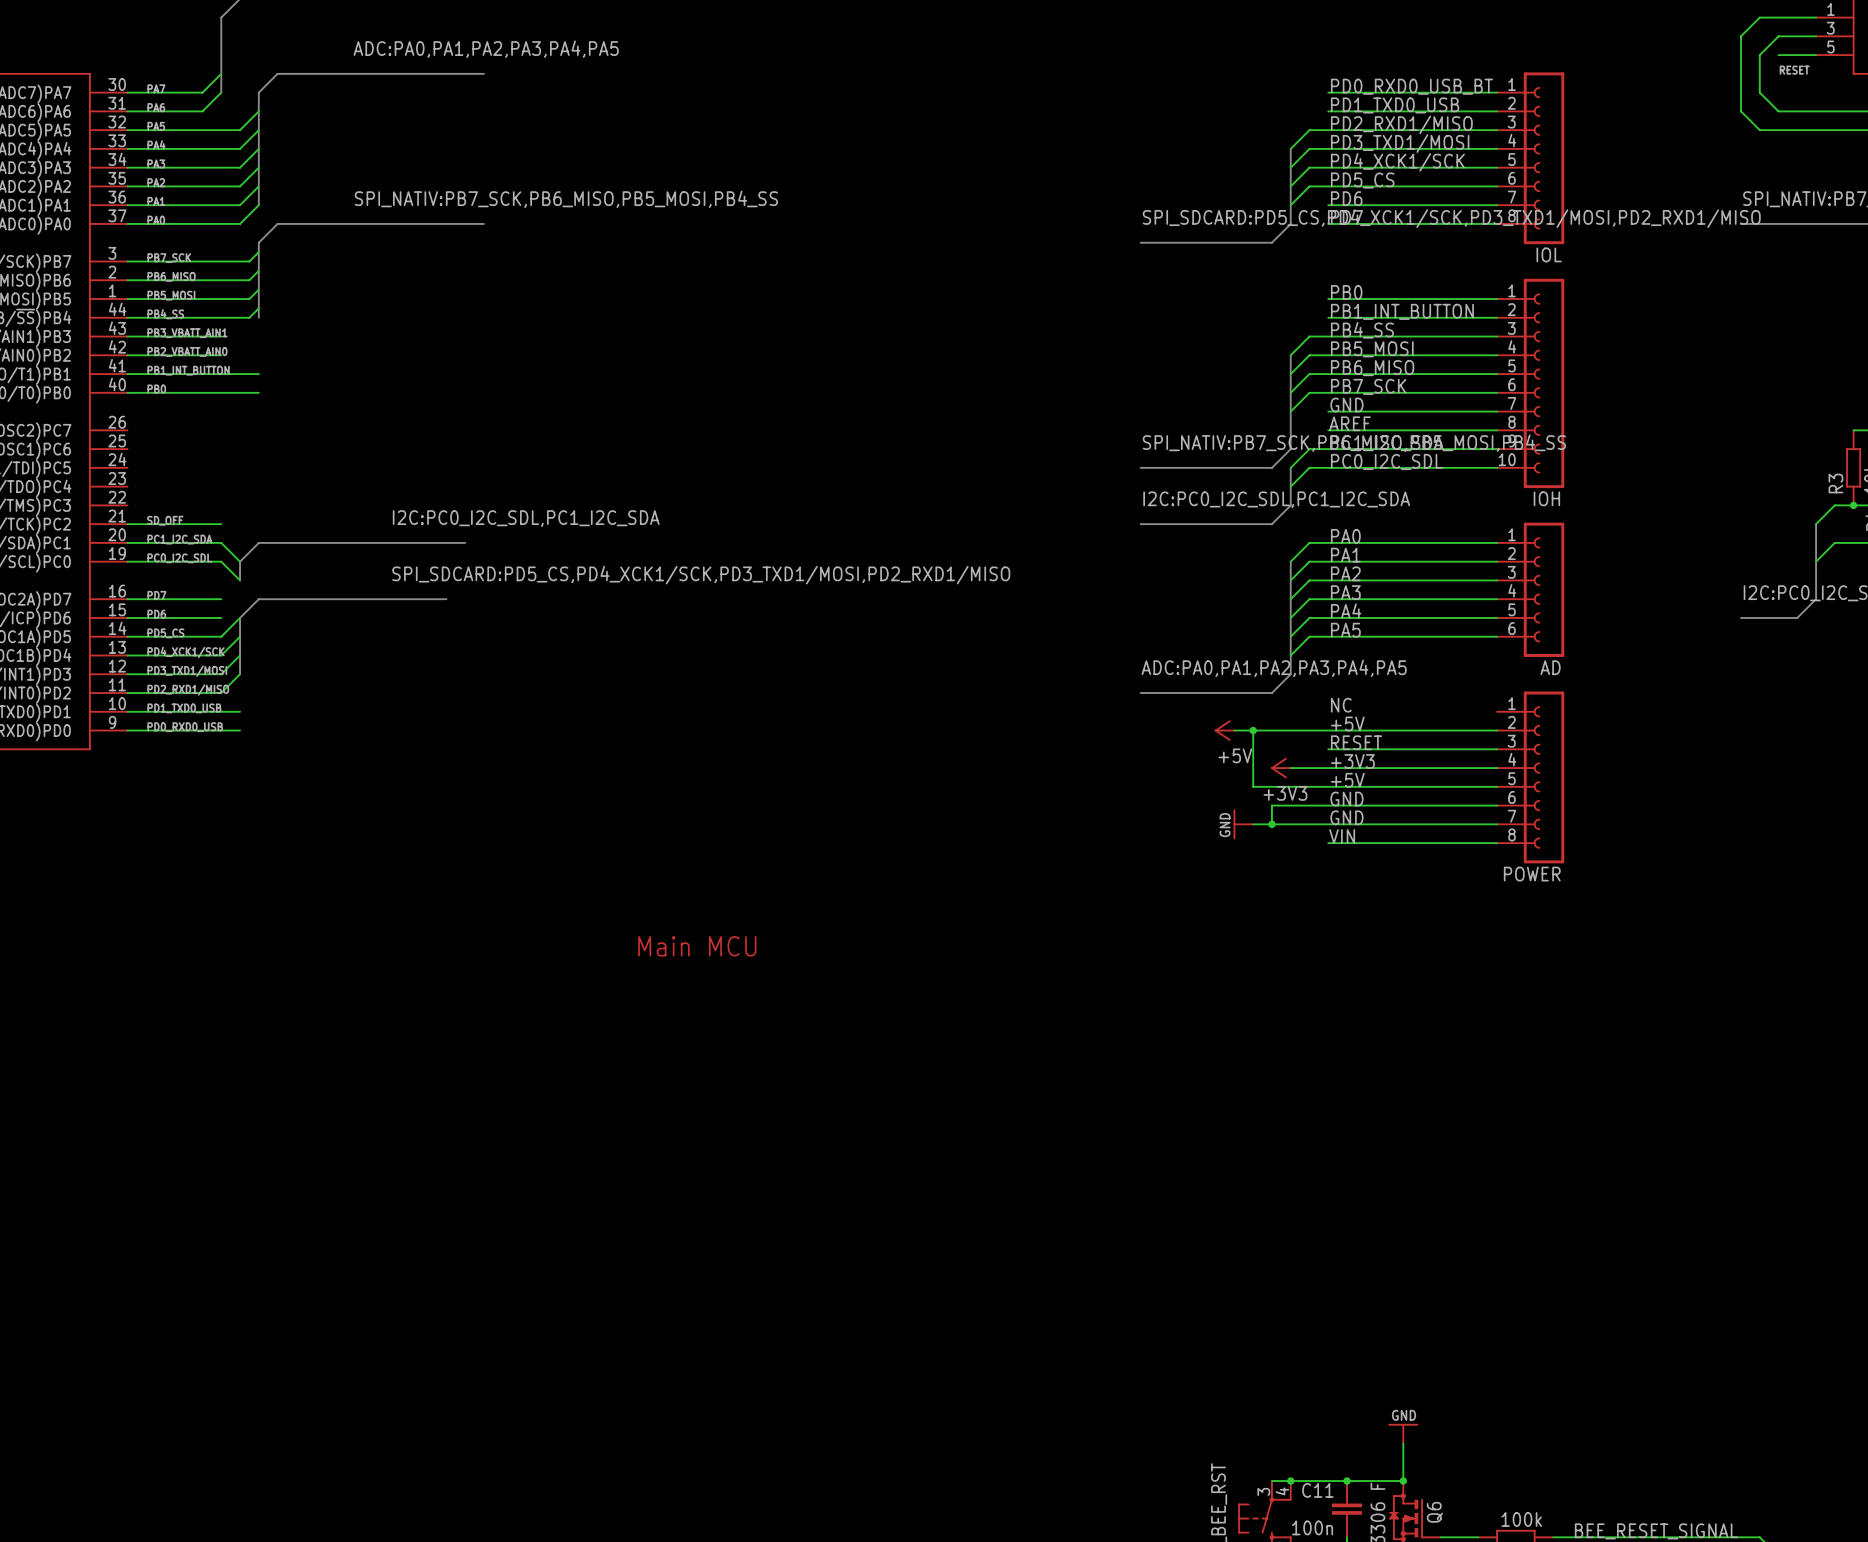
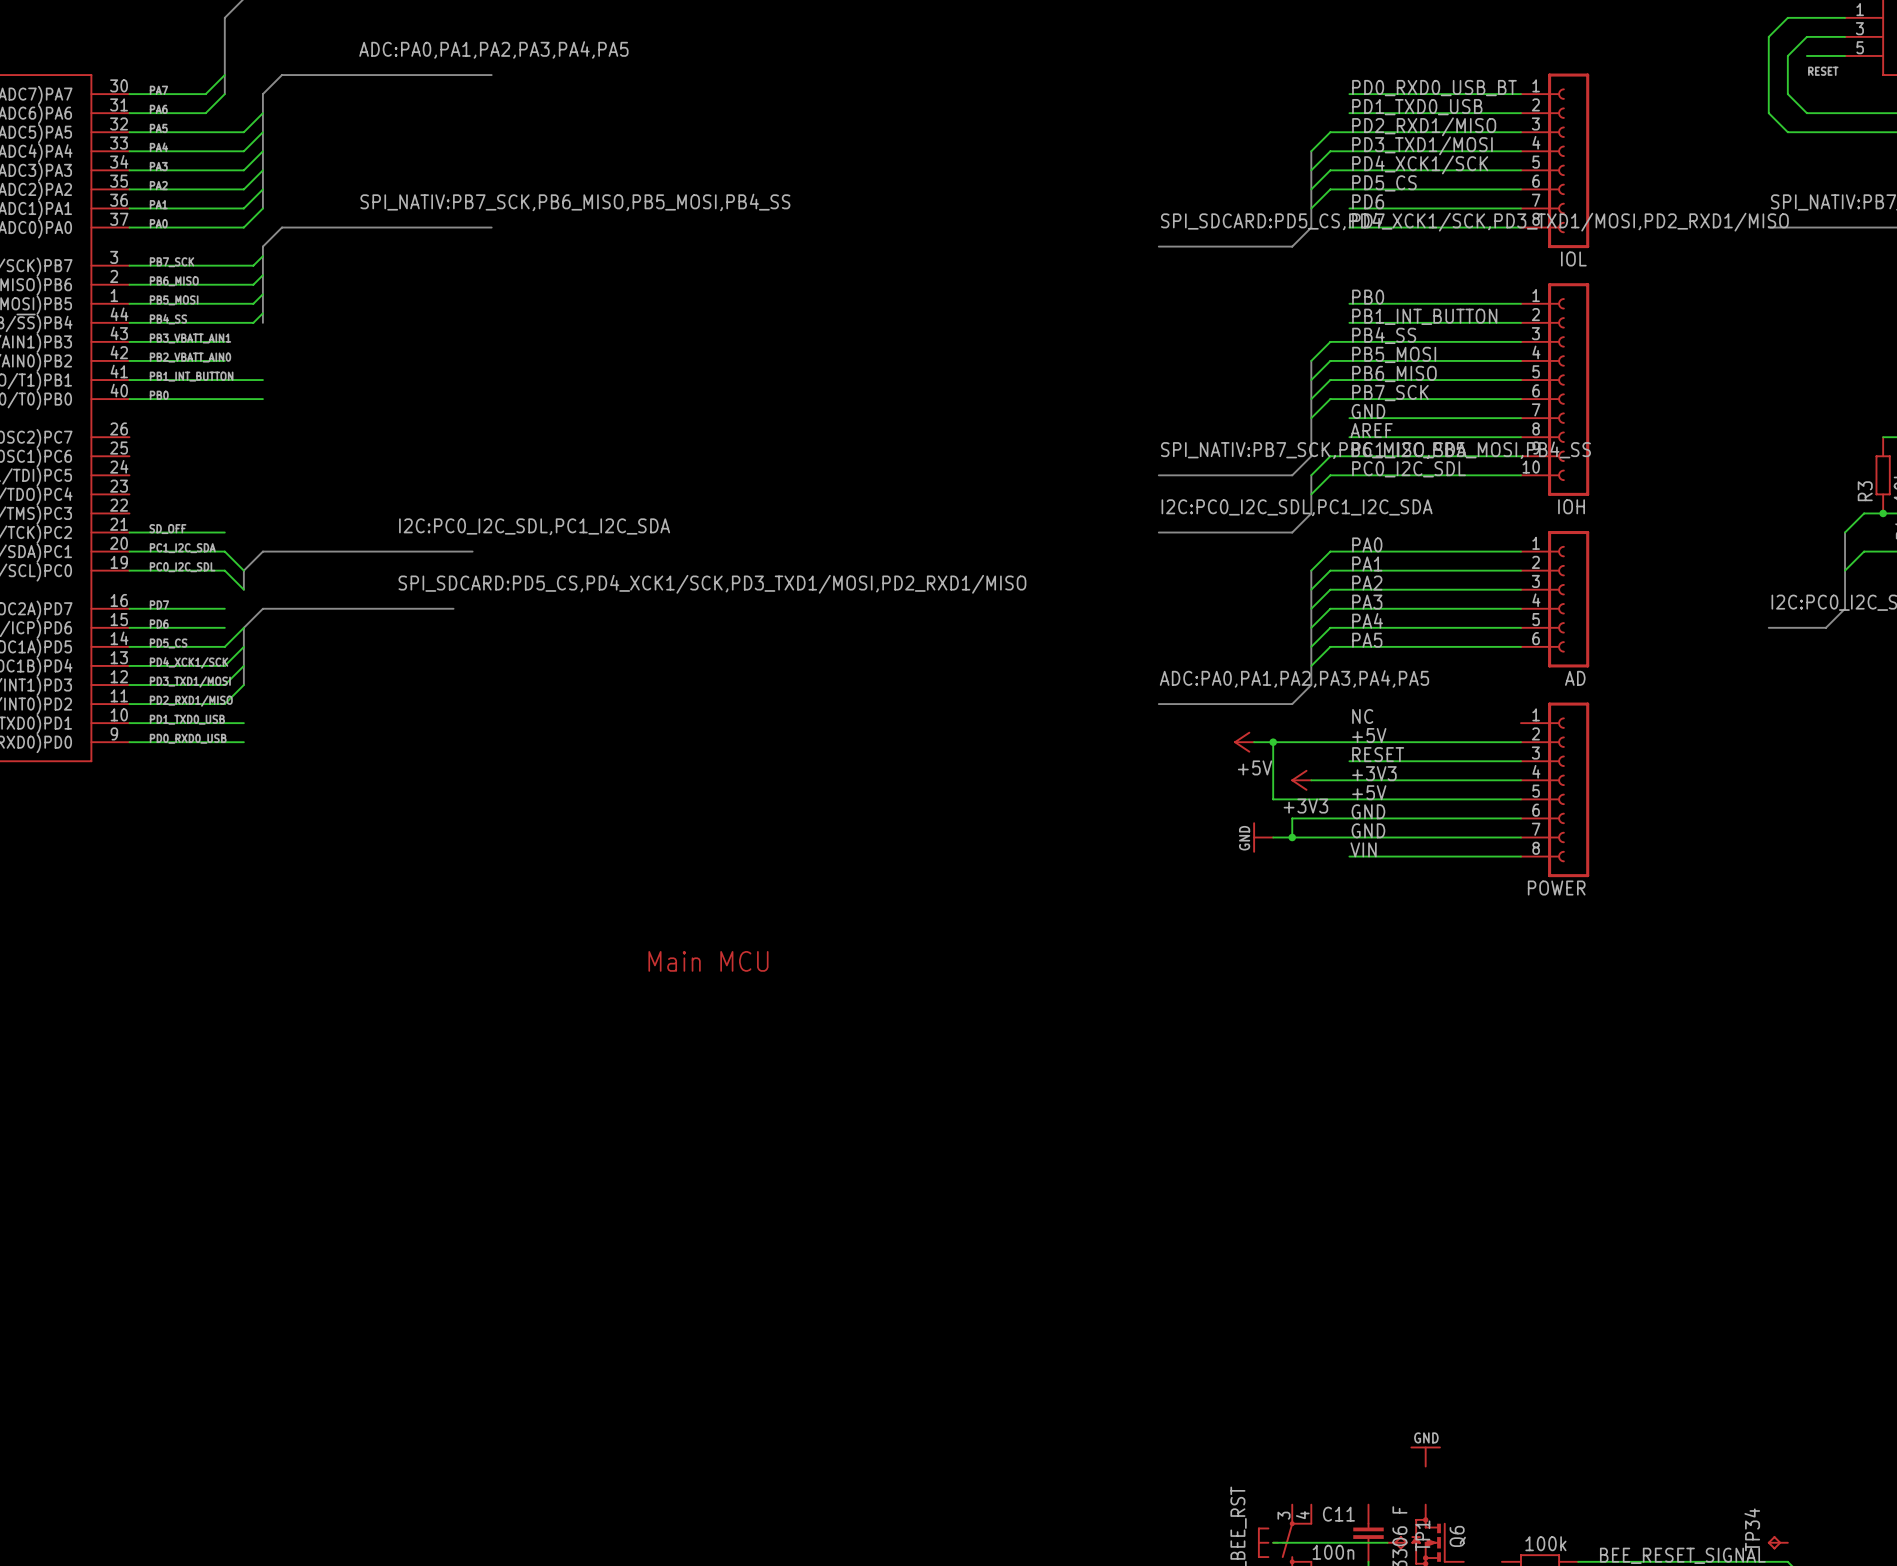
wire: (1403, 1443) (1403, 1481) (1271, 1481) -> none
junction: (1290, 1481) -> none
junction: (1347, 1481) -> none
junction: (1403, 1481) -> none
wire: none -> (1273, 1542) (1387, 1542)
TP1: none -> (1397, 1542)
TP34: none -> (1777, 1542)
wire: (1440, 1537) (1478, 1537) -> none

